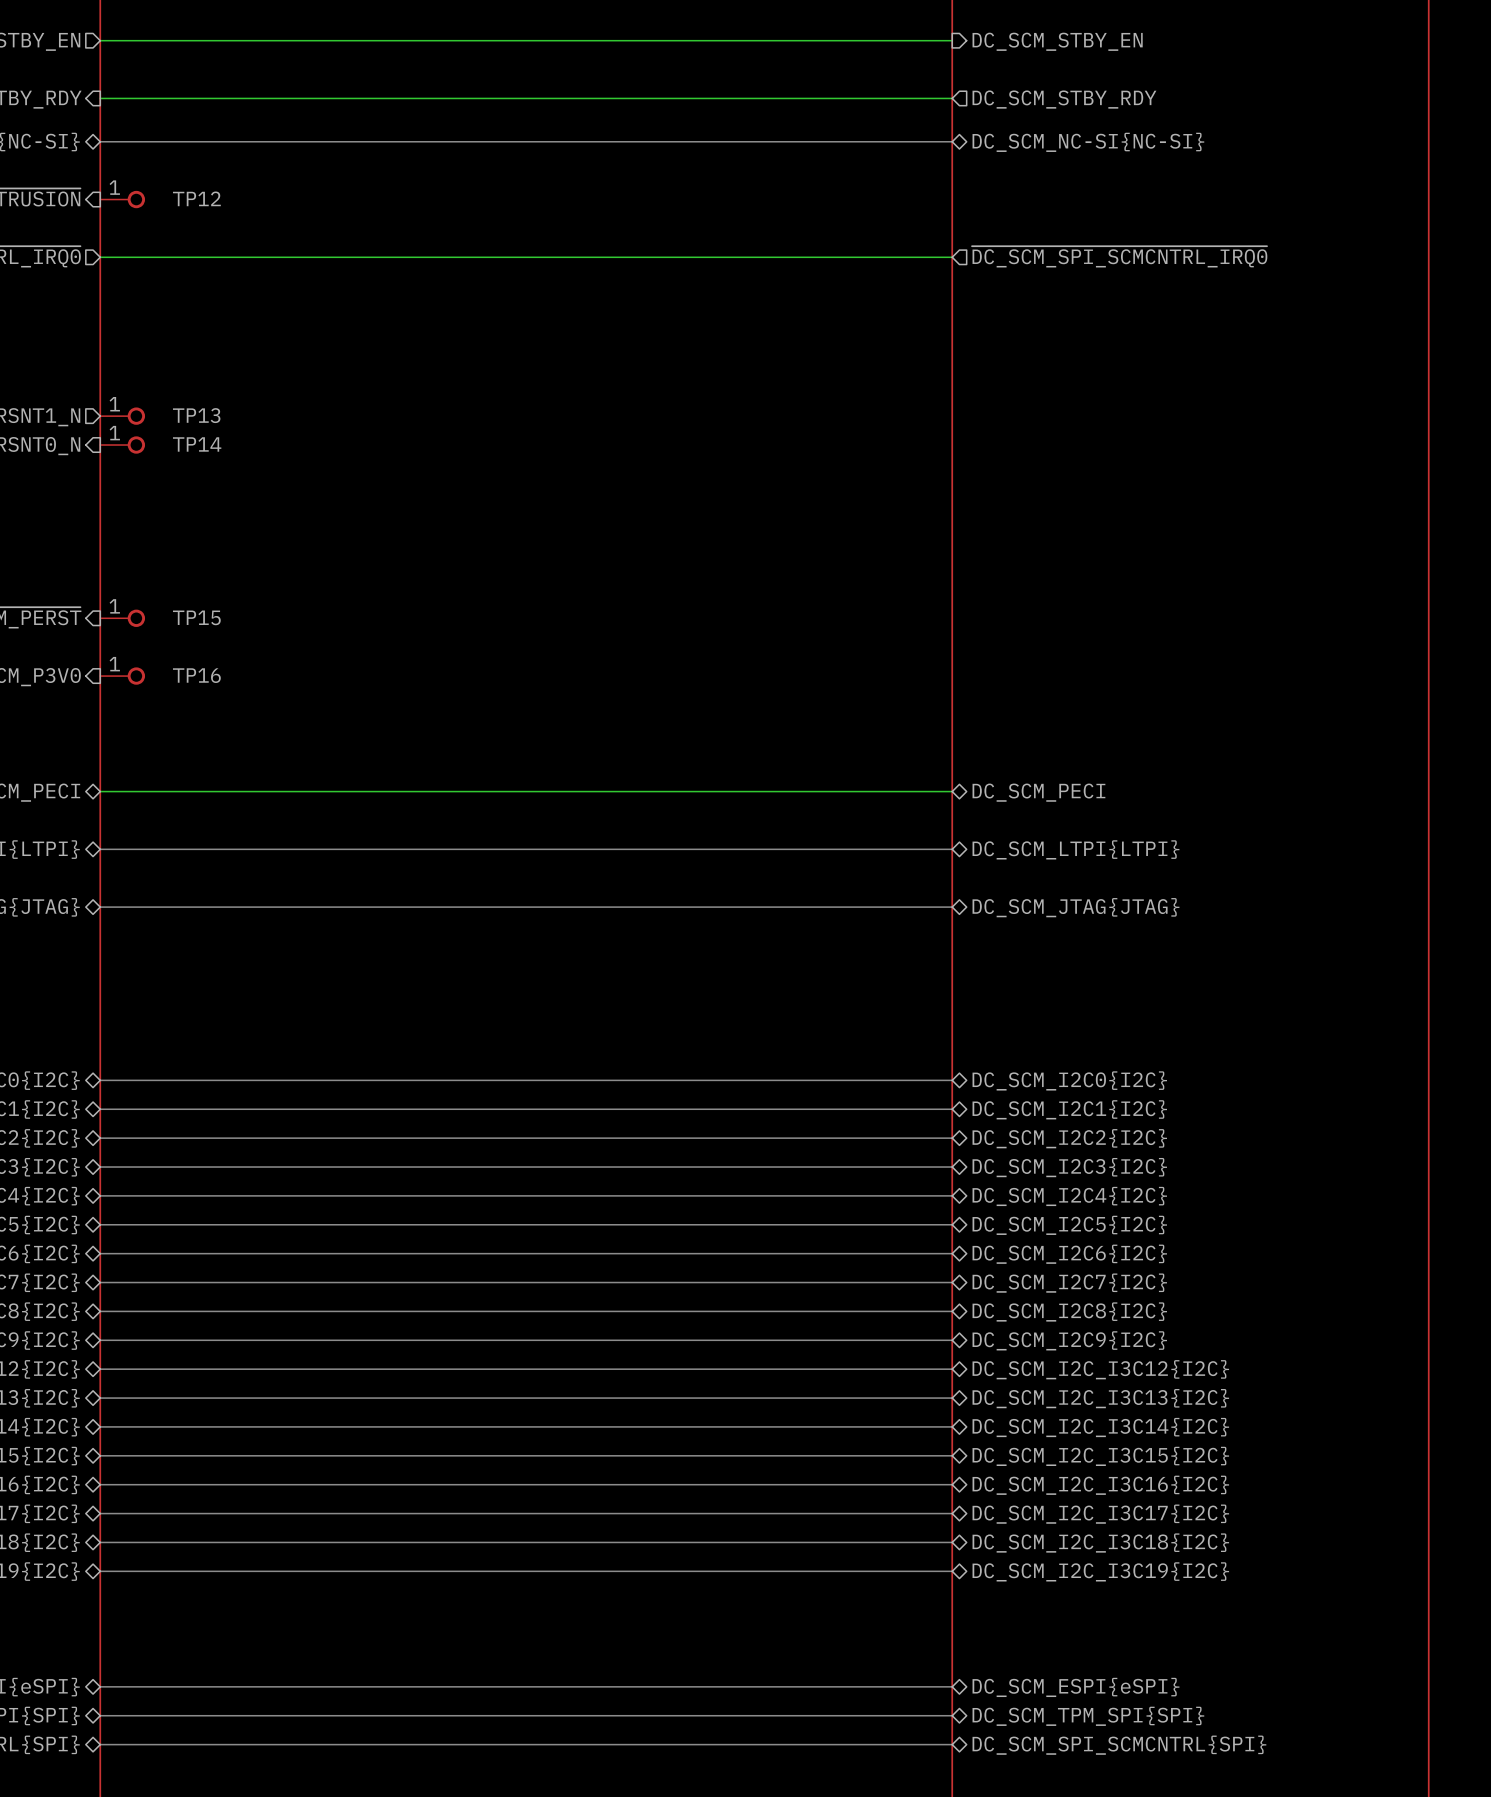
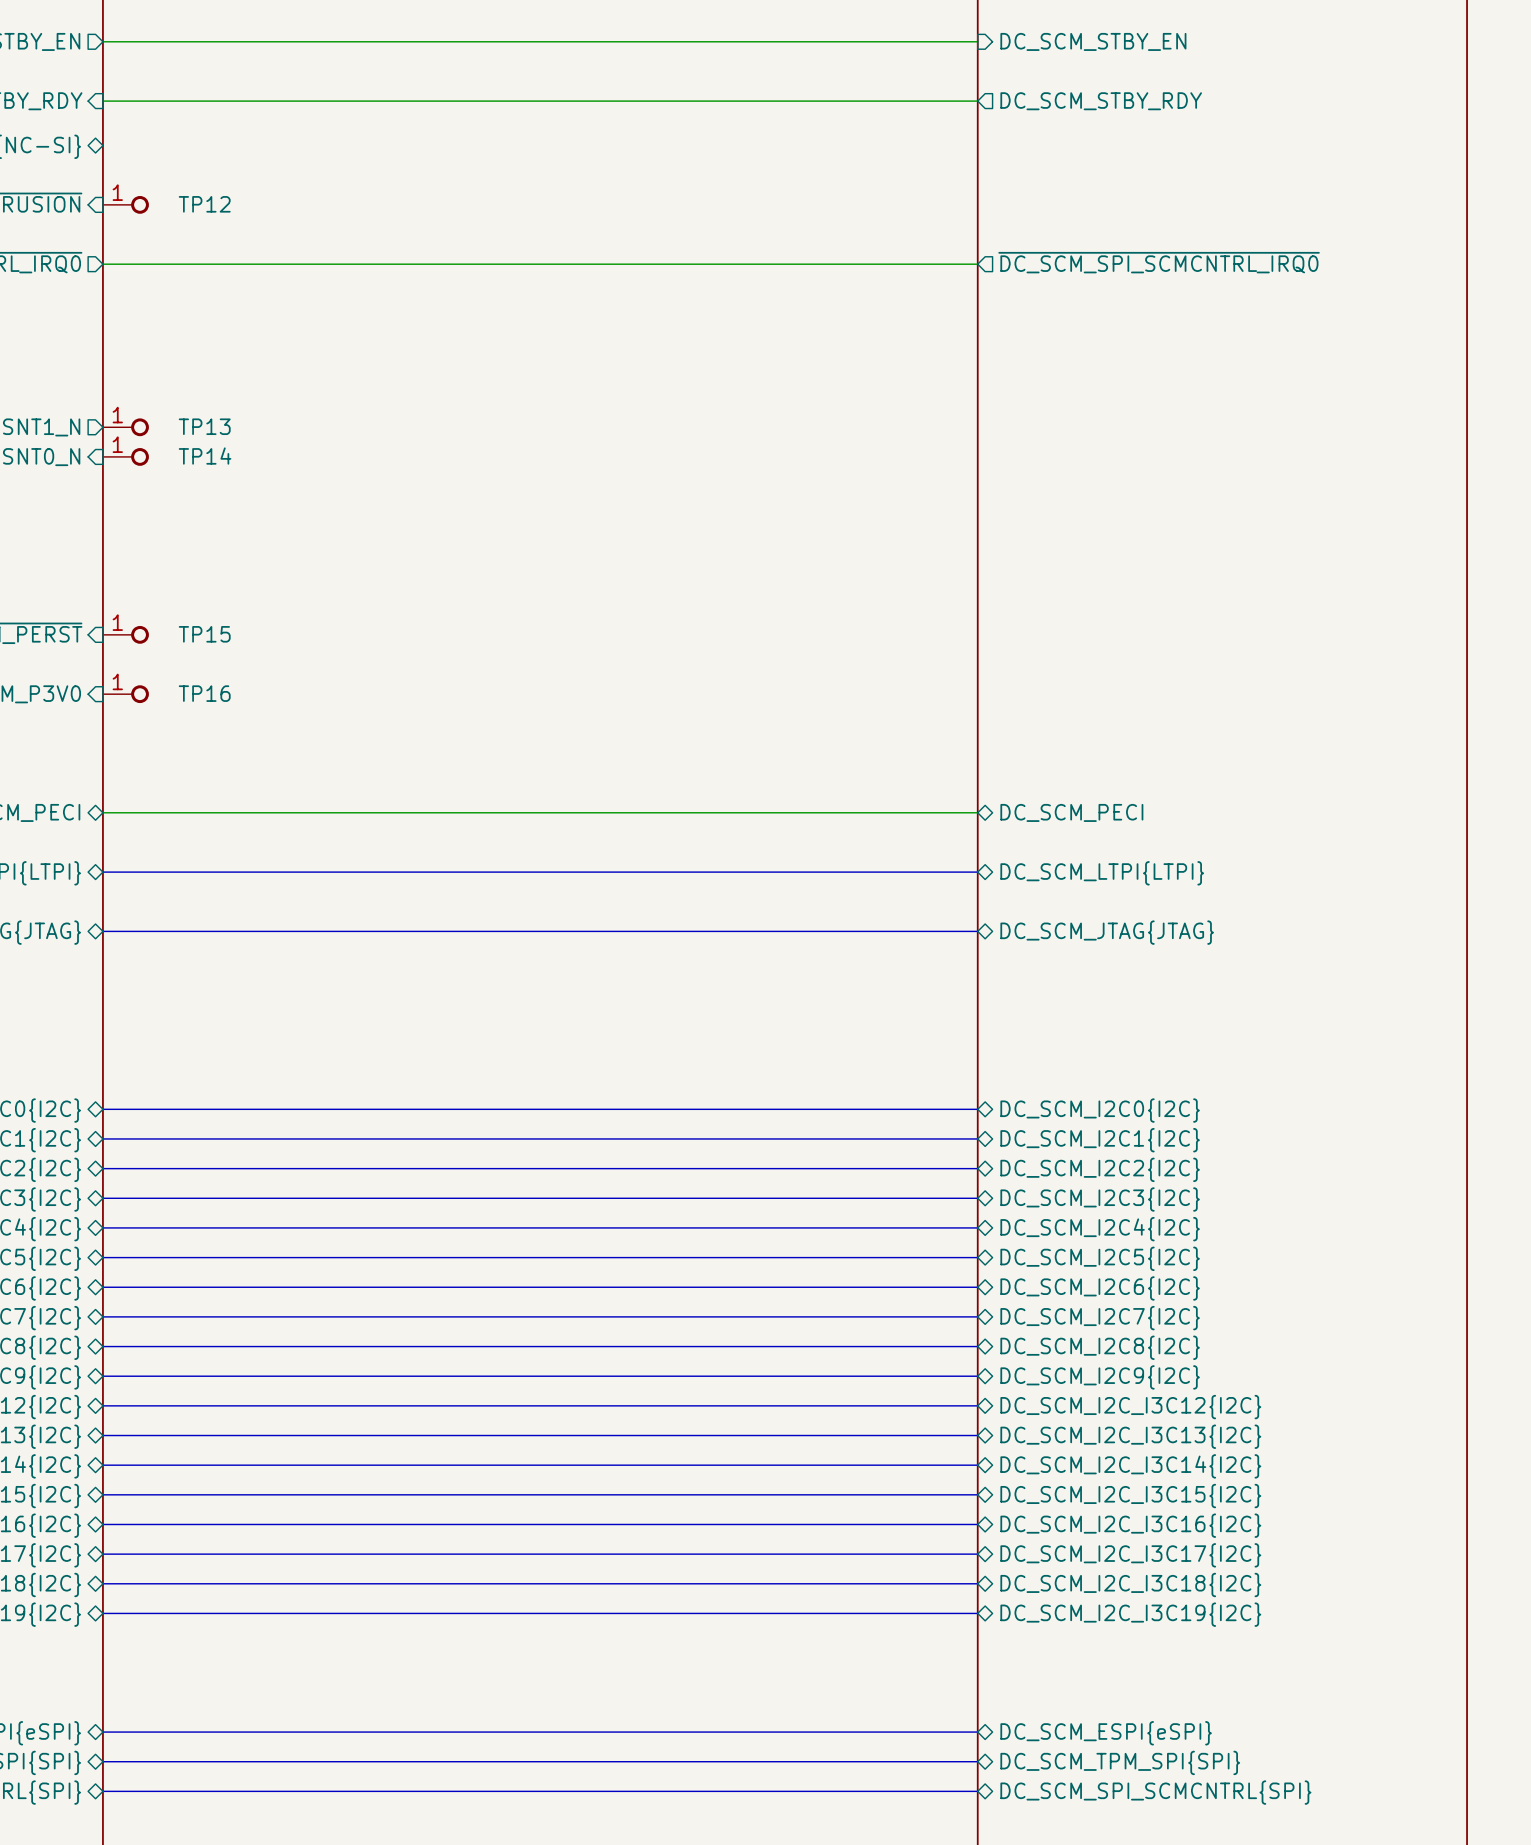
bus: (100, 141) (952, 141) -> none
sheet pin: DC_SCM_NC-SI{NC-SI} (1088, 142) -> none

